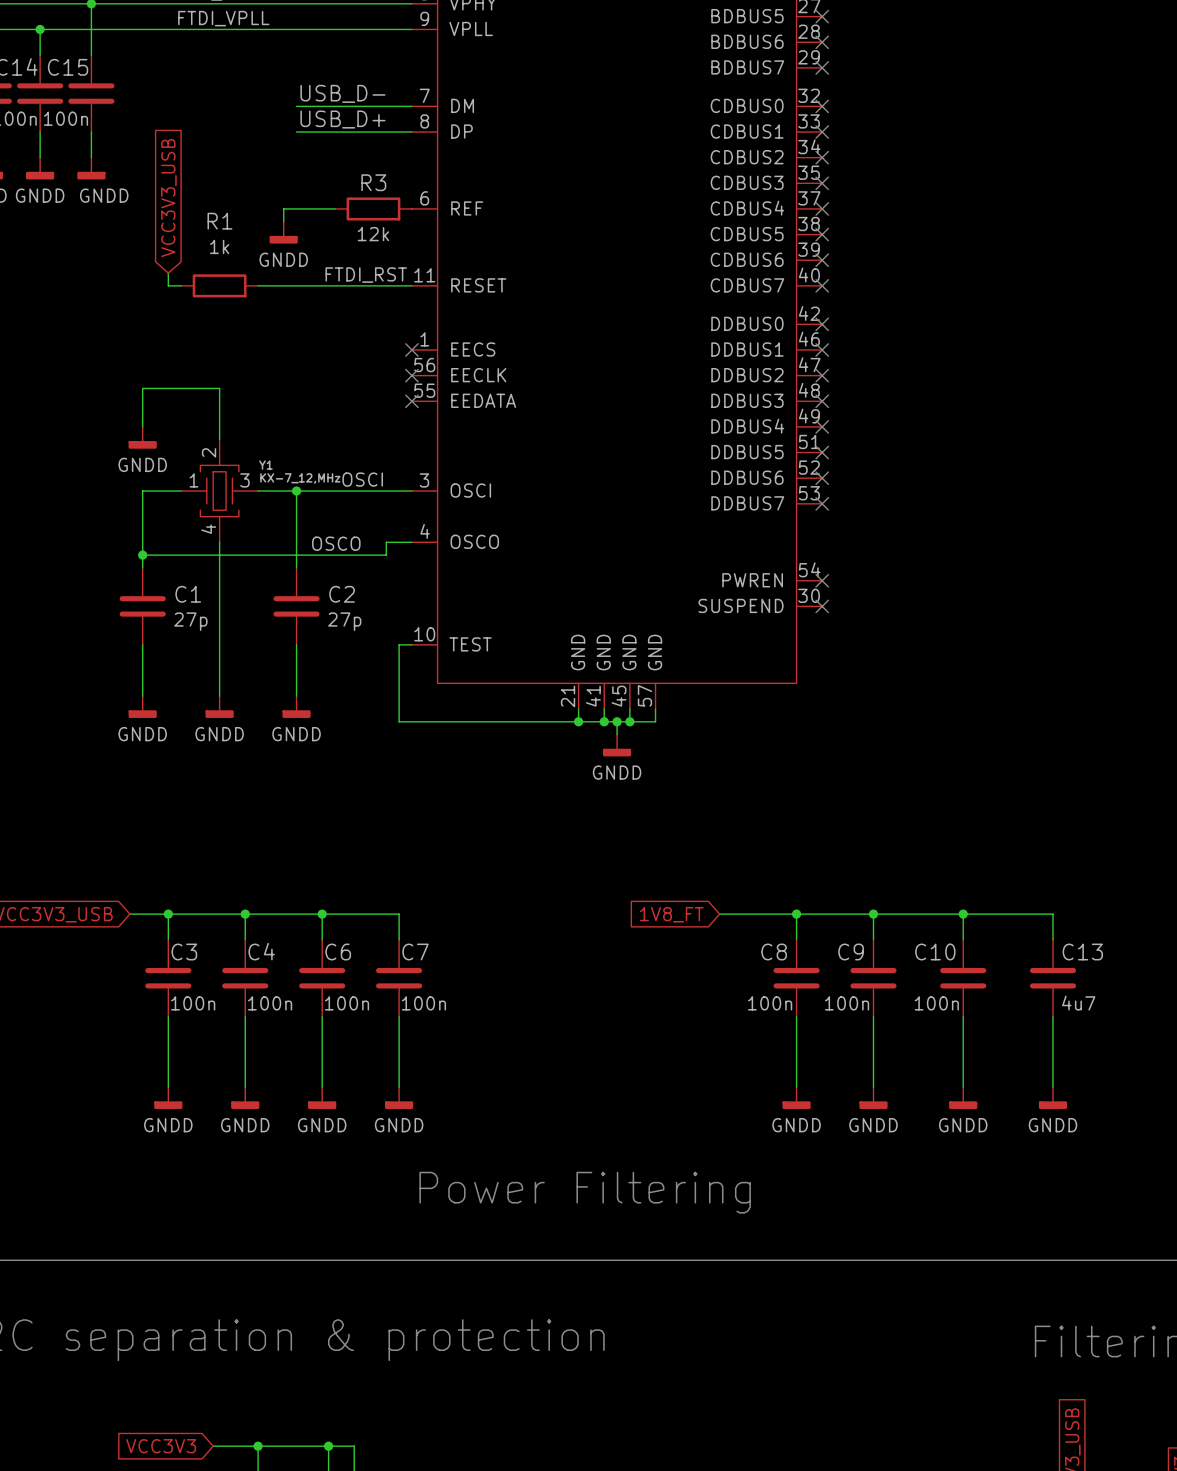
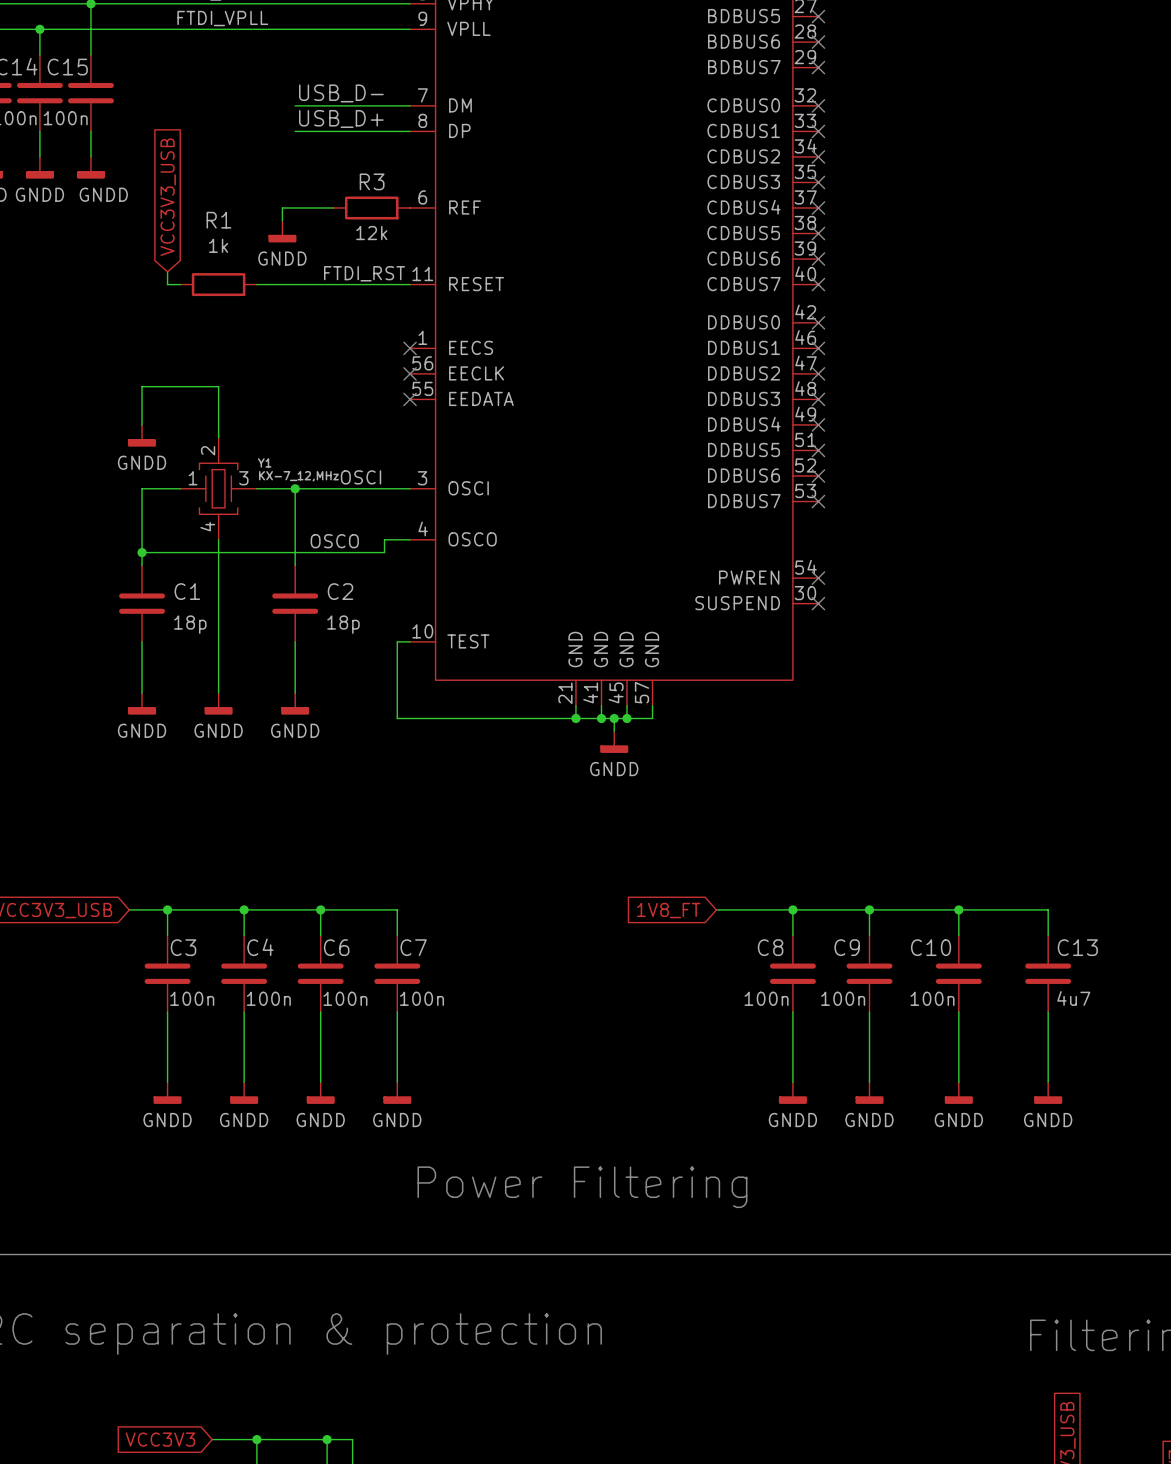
C1 text: 27p (190, 621) -> 18p (190, 624)
C2 text: 27p (344, 621) -> 18p (343, 624)

